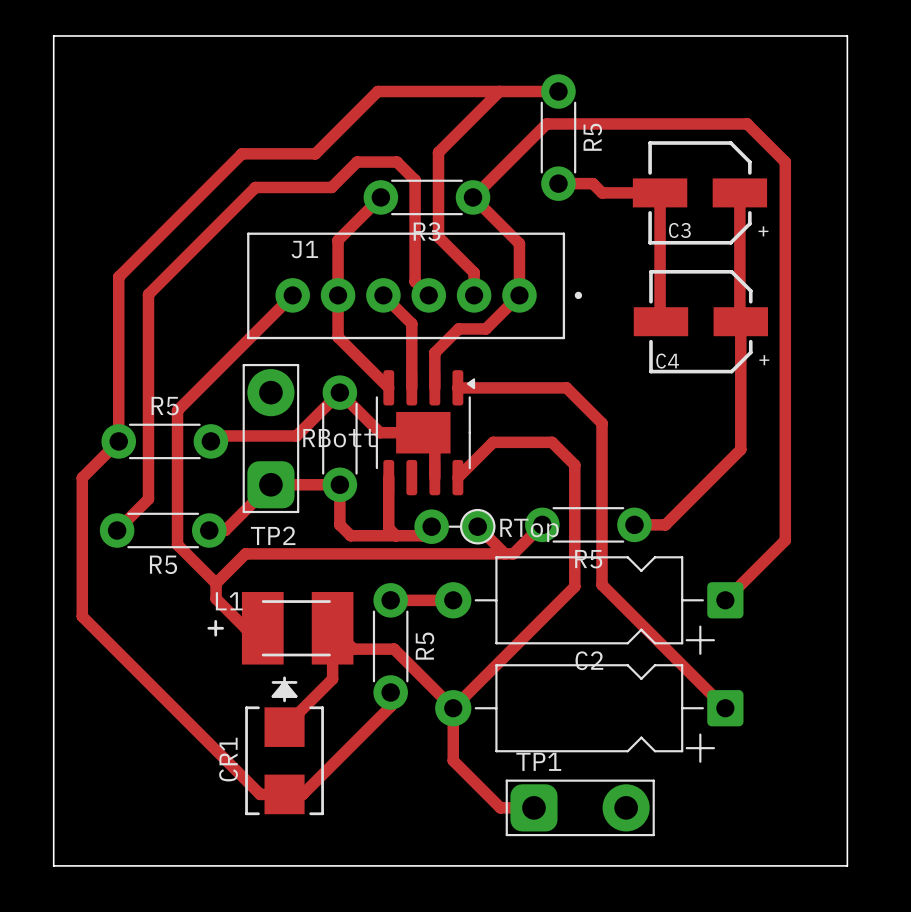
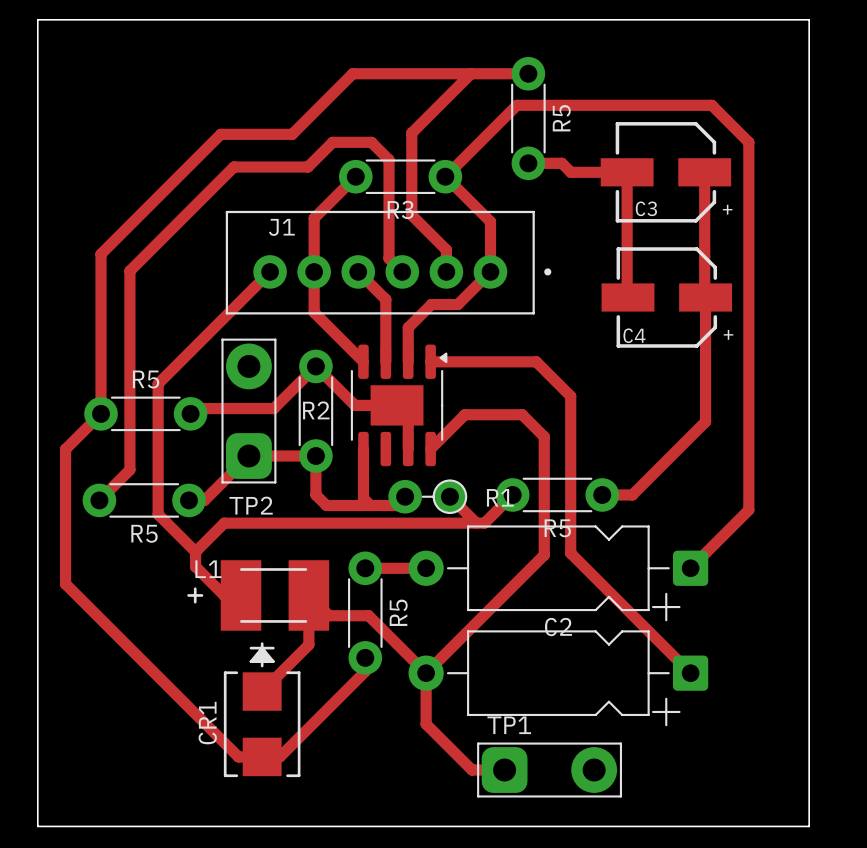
RBott name: RBott (340, 438) -> R2 (316, 410)
RTop name: RTop (529, 530) -> R1 (500, 497)

